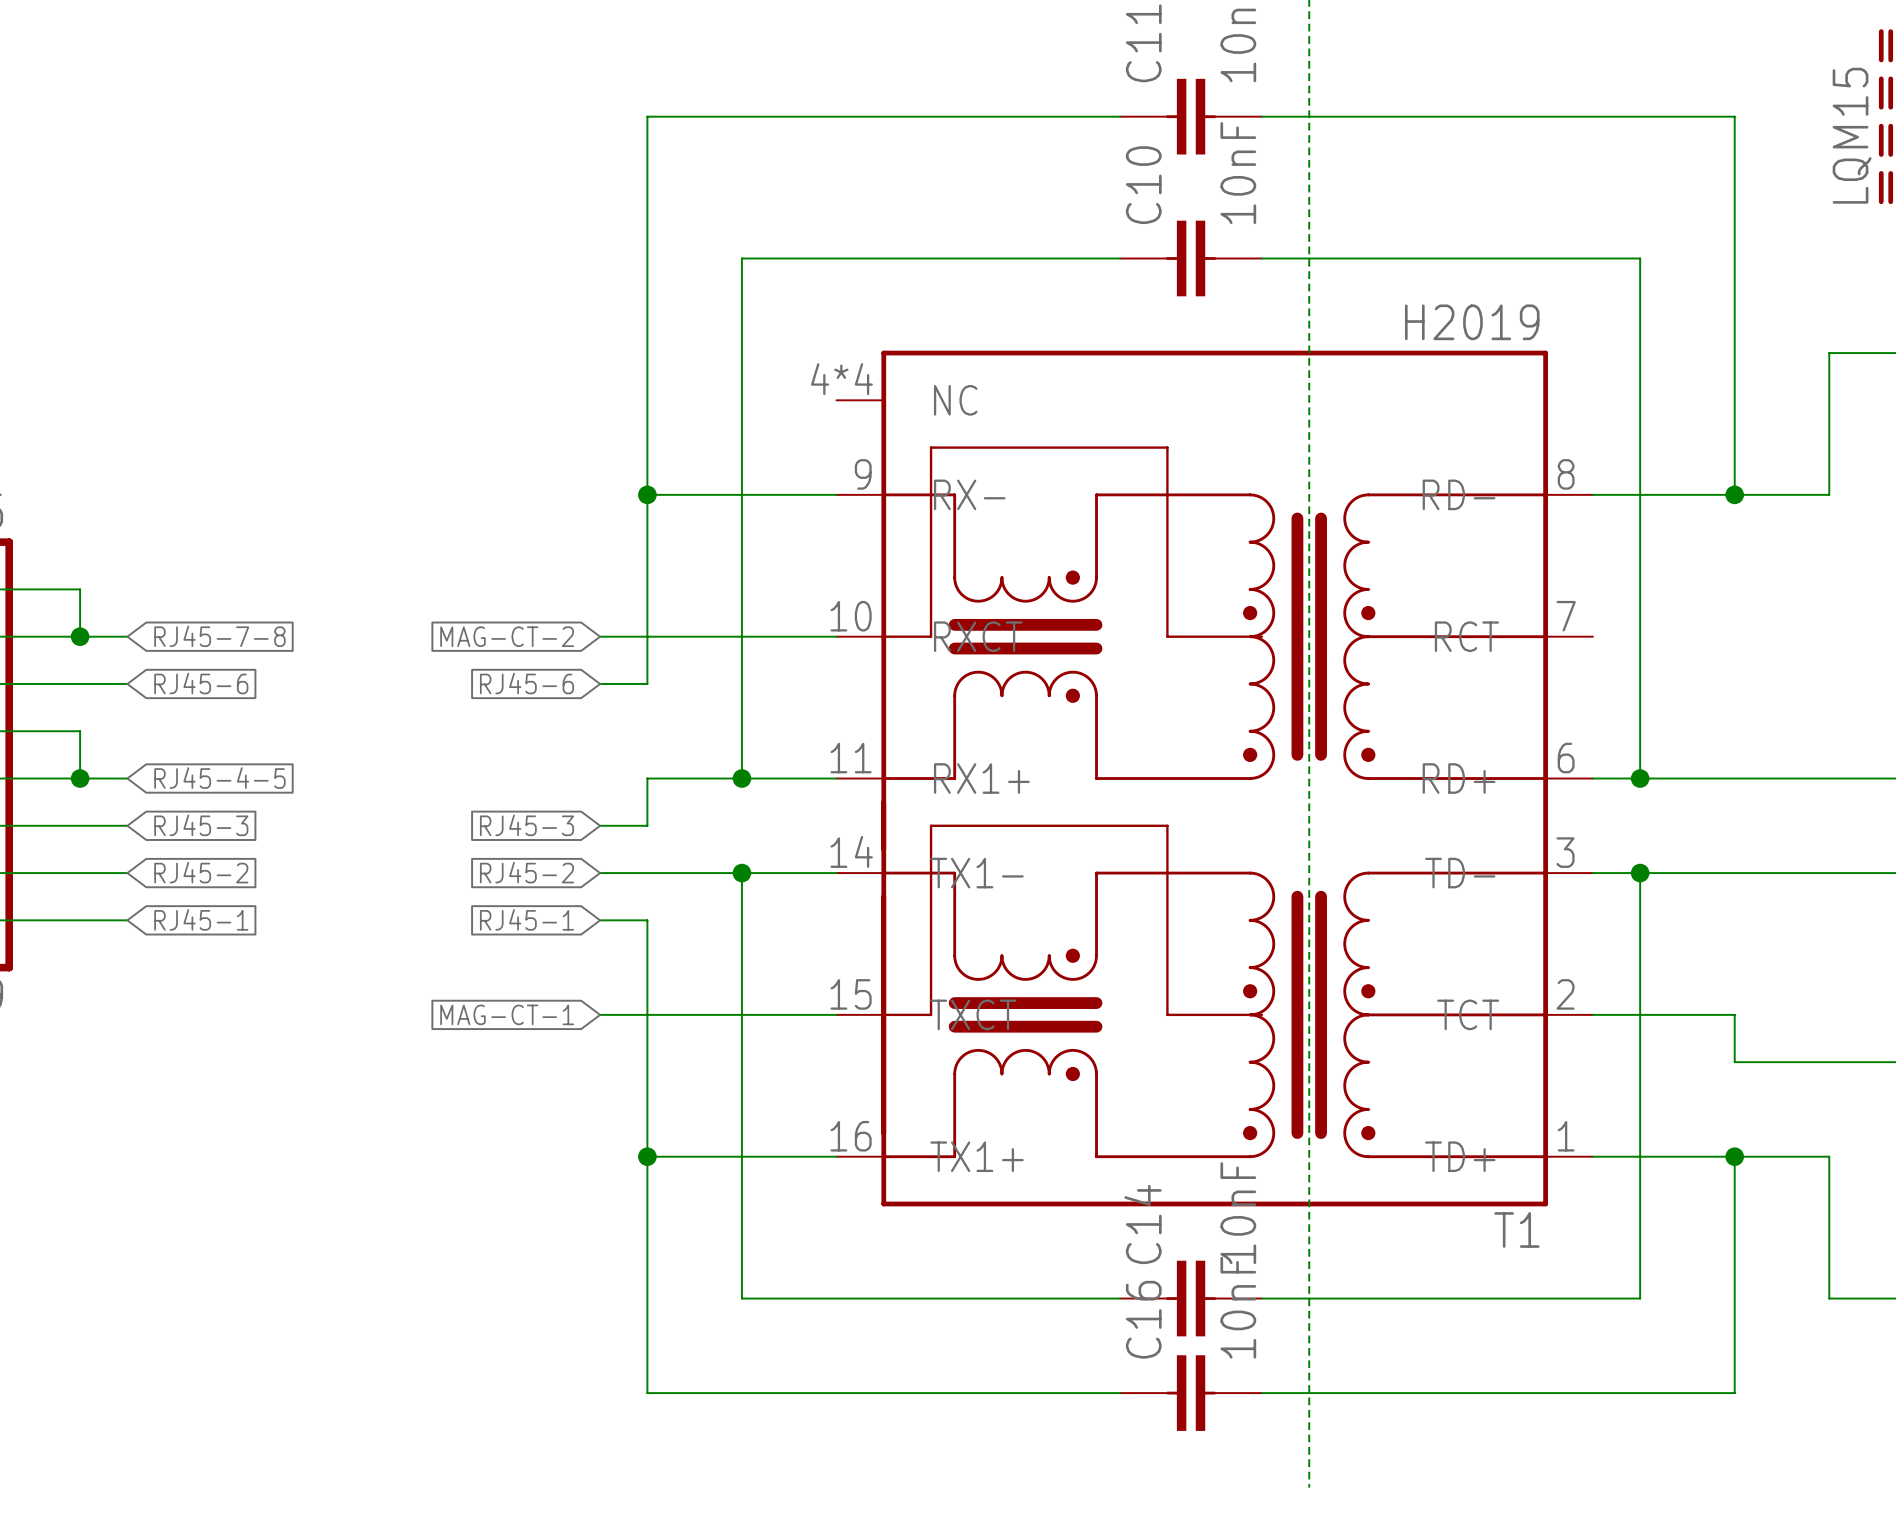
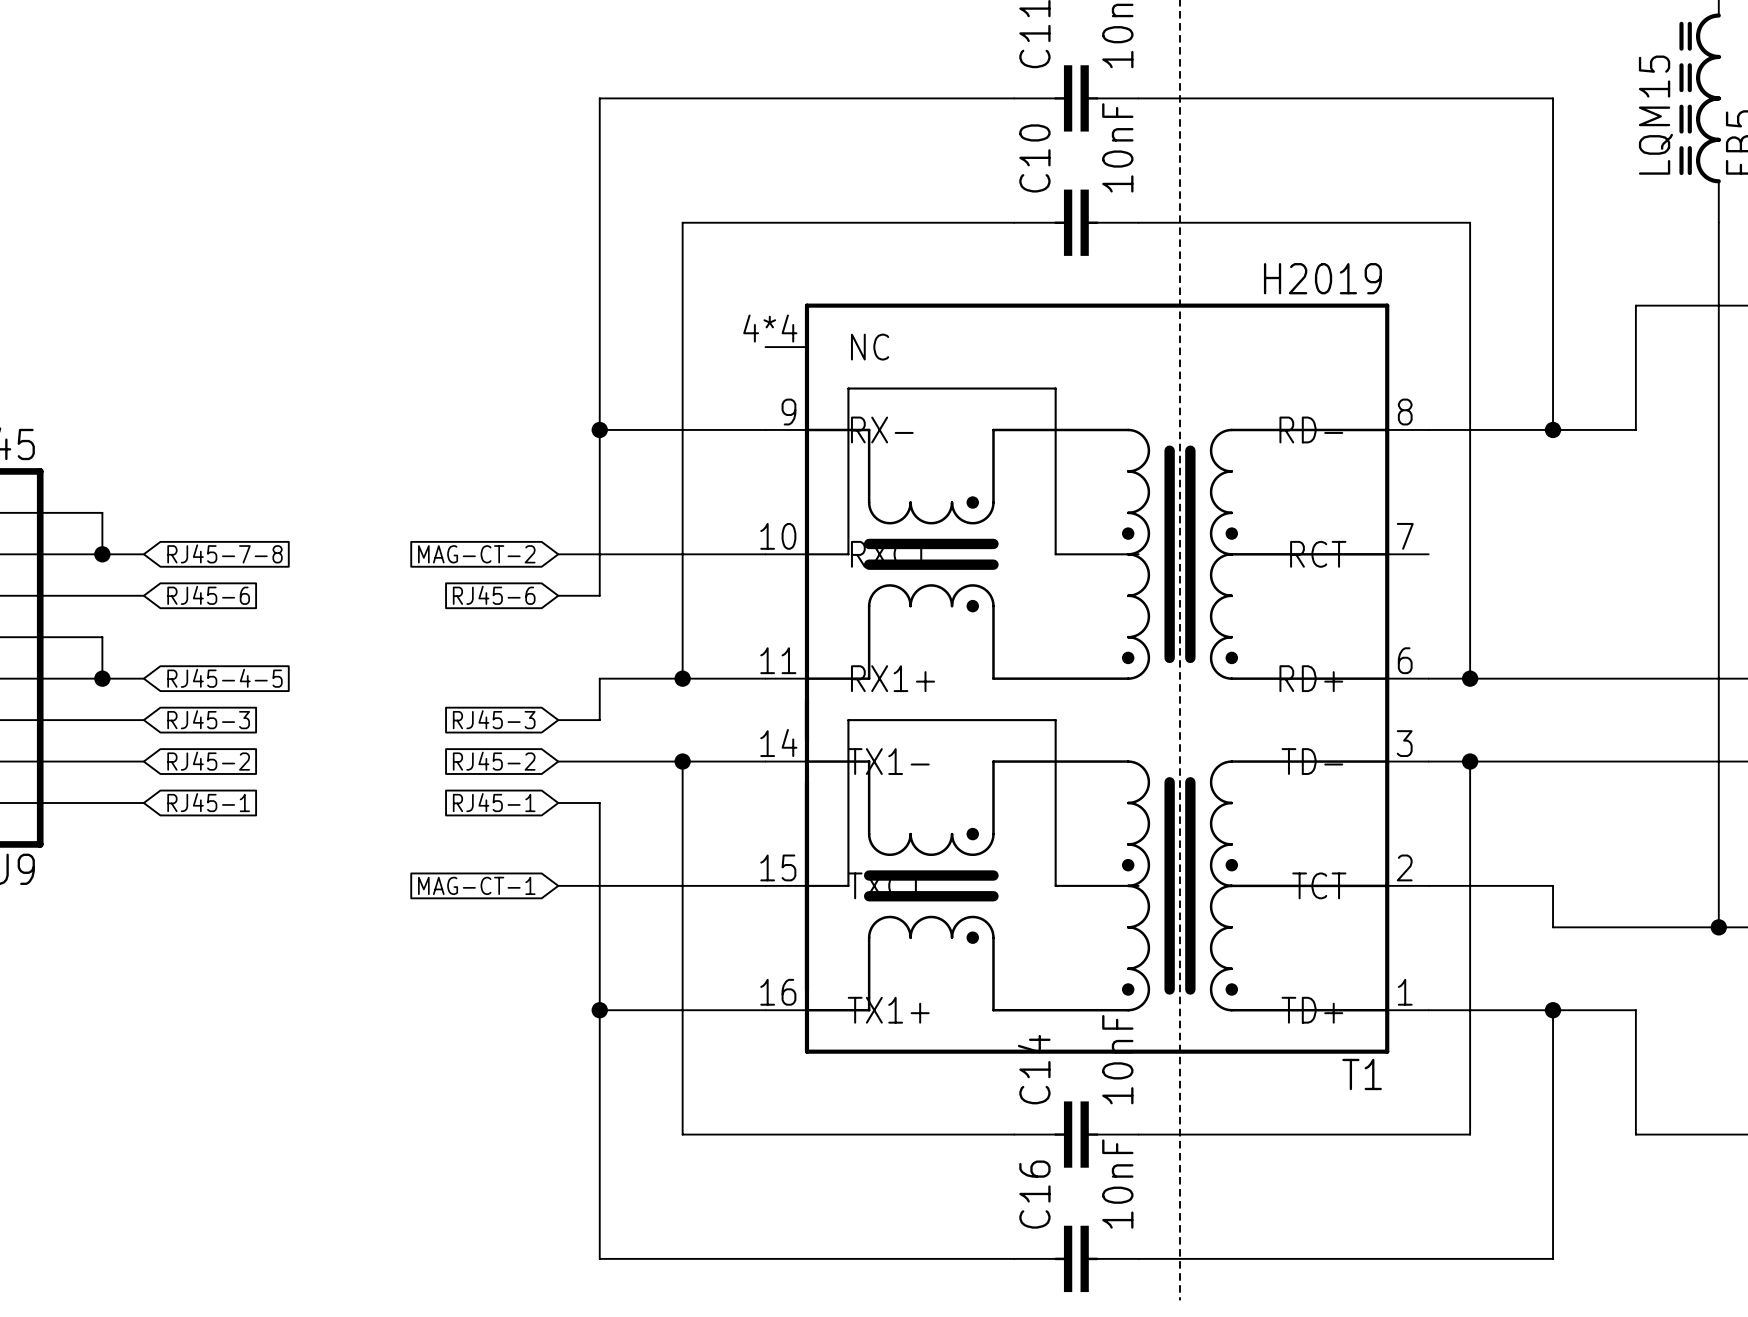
wire: (647, 1393) (1120, 1393) -> (599, 1217) (599, 1258) (1014, 1258)
C16 position: (1191, 1393) -> (1076, 1258)
wire: (1261, 1393) (1734, 1393) -> (1138, 1258) (1553, 1258) (1553, 1217)

